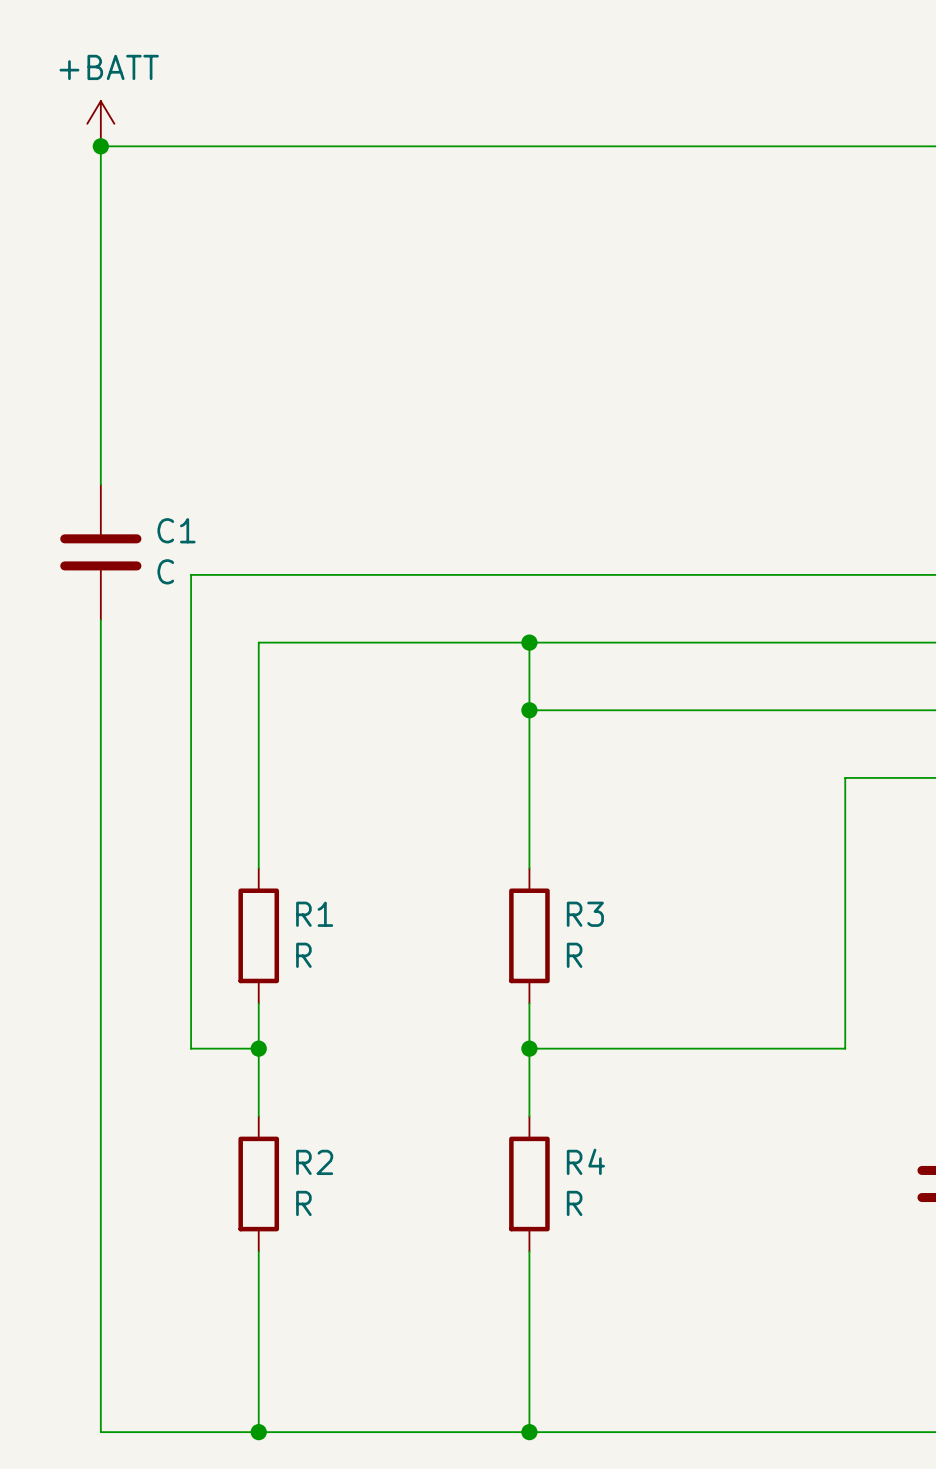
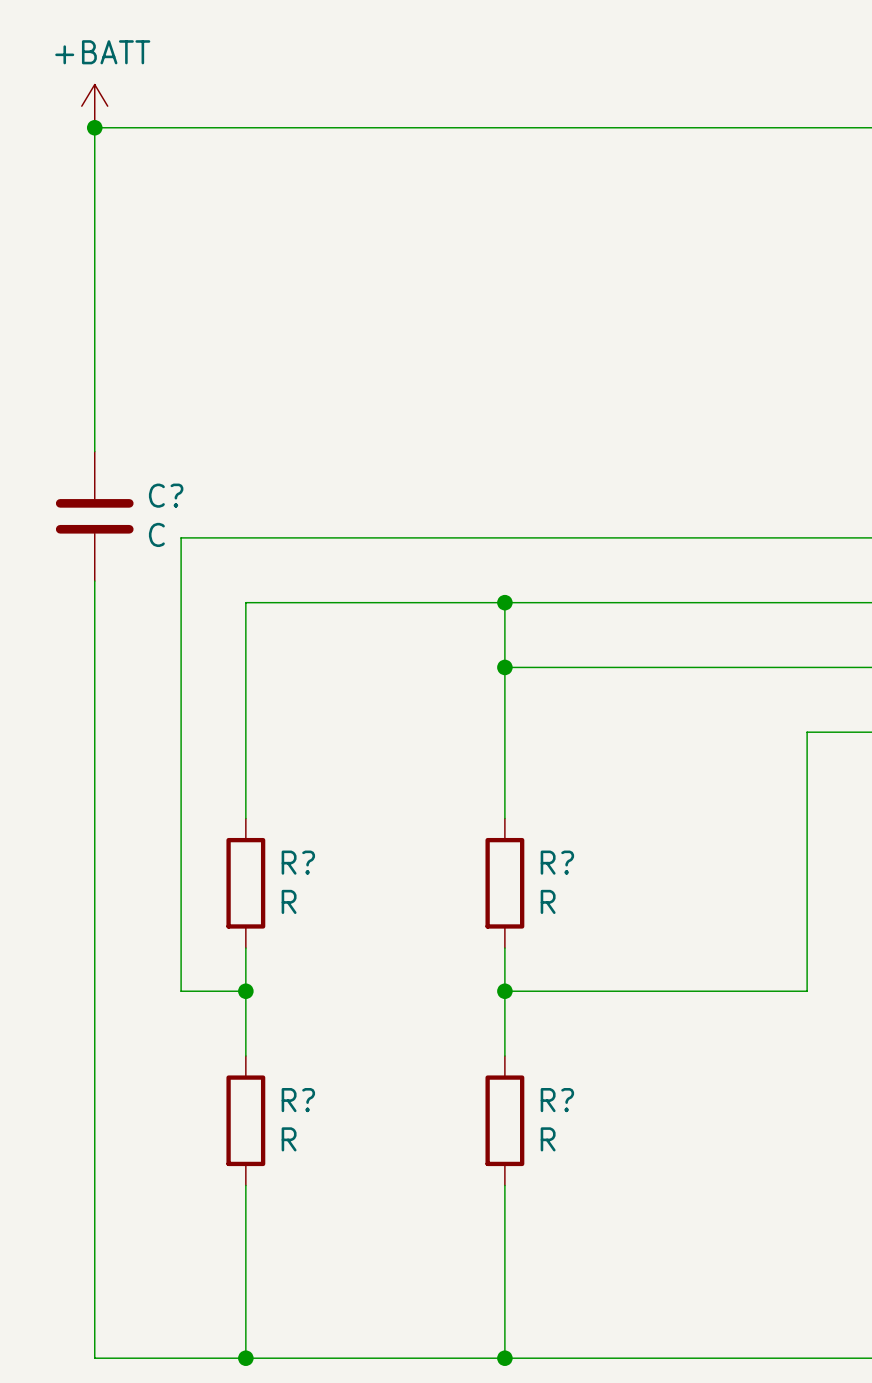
C1 name: C1 (176, 530) -> C? (166, 495)
R1 name: R1 (314, 914) -> R? (298, 862)
R3 name: R3 (585, 914) -> R? (557, 862)
R4 name: R4 (585, 1161) -> R? (557, 1100)
R2 name: R2 (314, 1162) -> R? (298, 1100)

